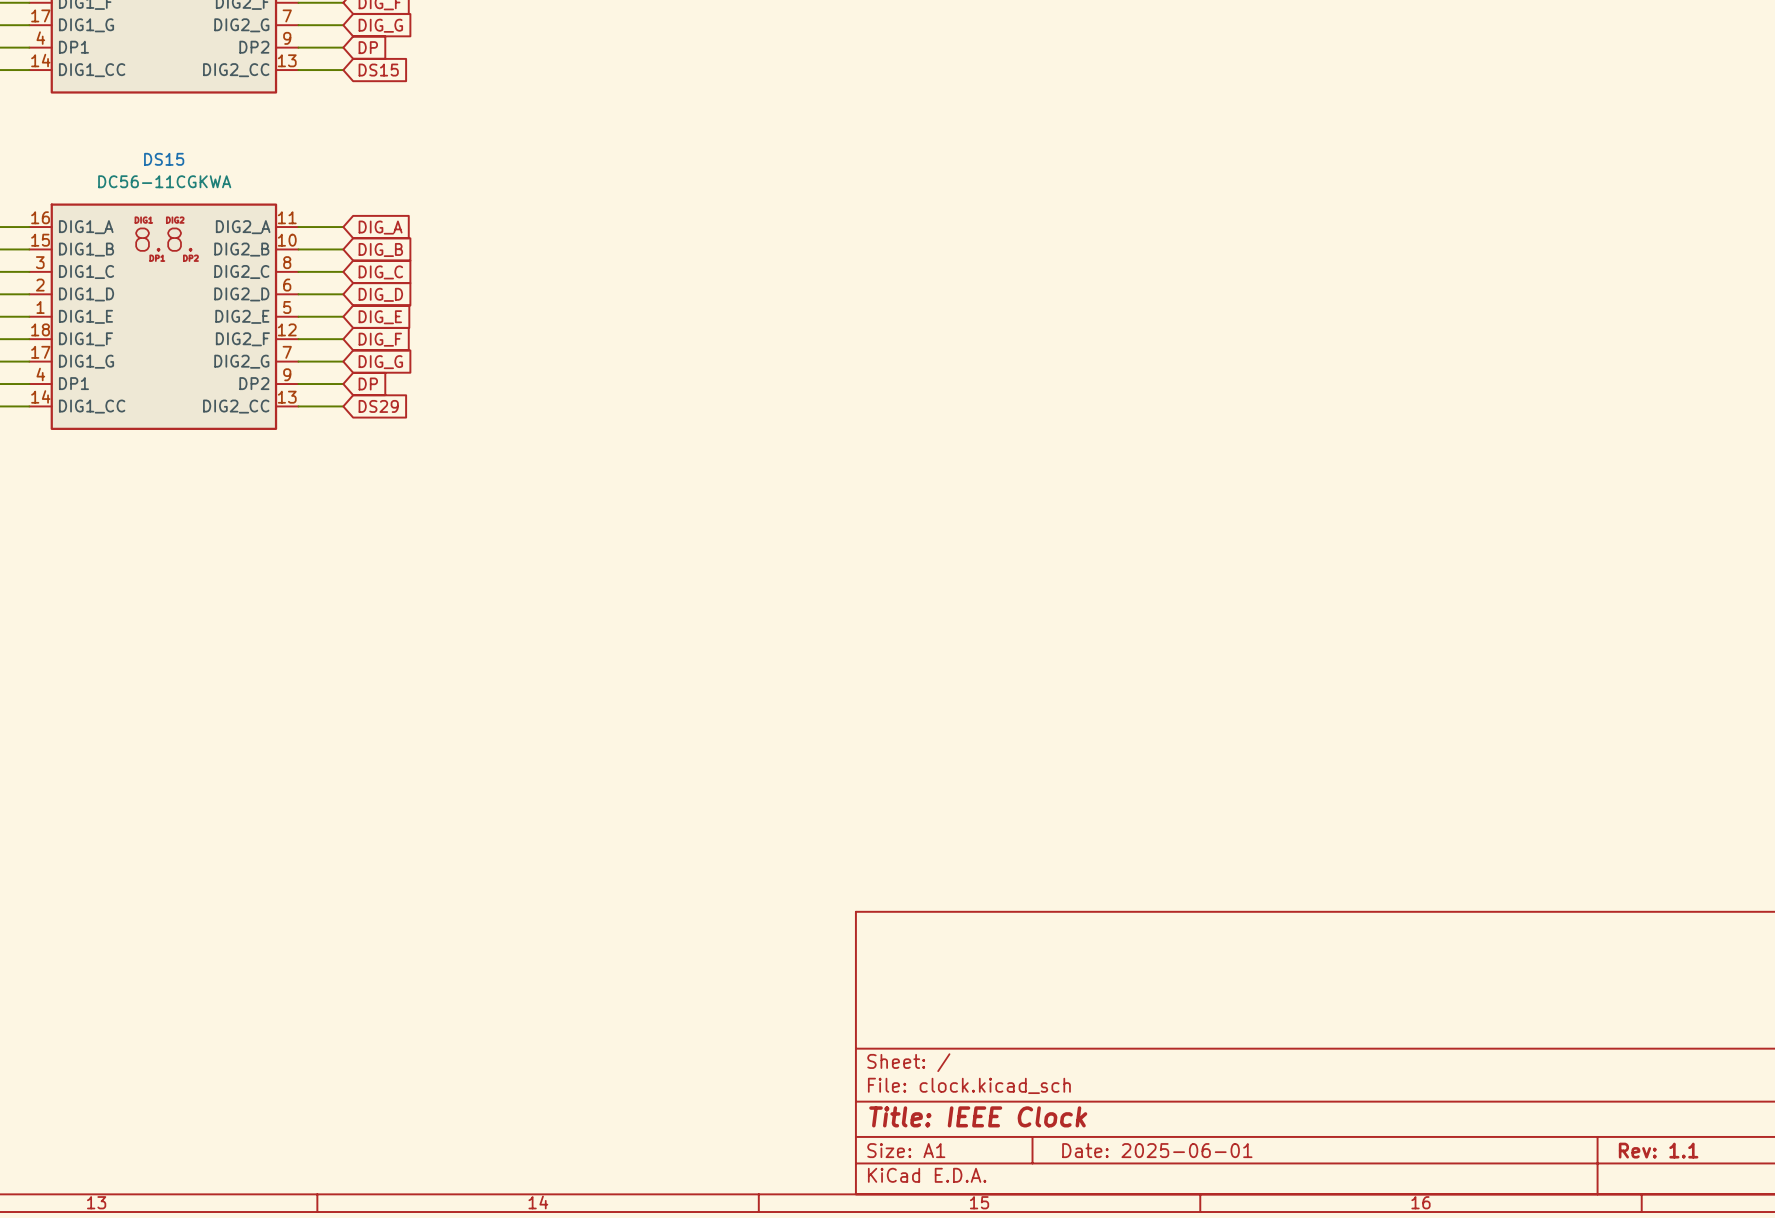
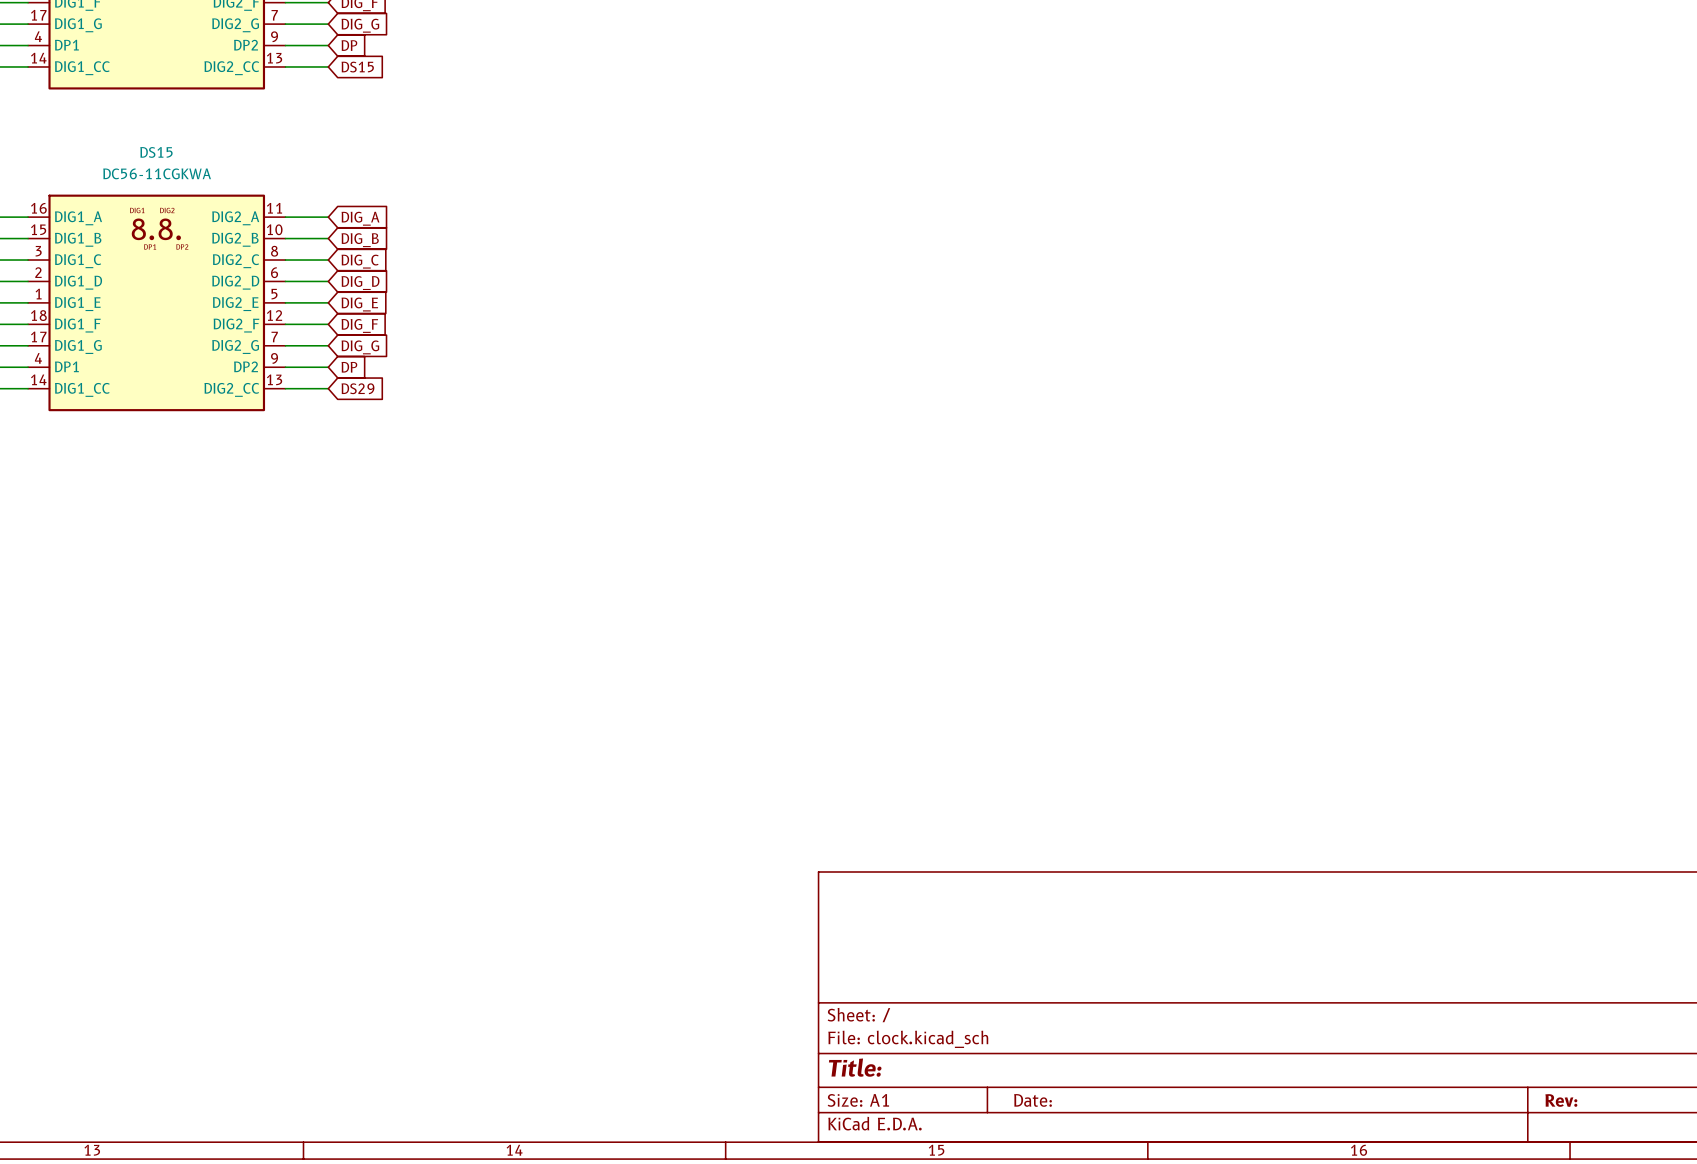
title block: Title: IEEE Clock (978, 1116) -> Title: (855, 1067)
title block: Date: 2025-06-01 (1157, 1150) -> Date: (1033, 1100)
title block: Rev: 1.1 (1658, 1150) -> Rev: (1561, 1100)

